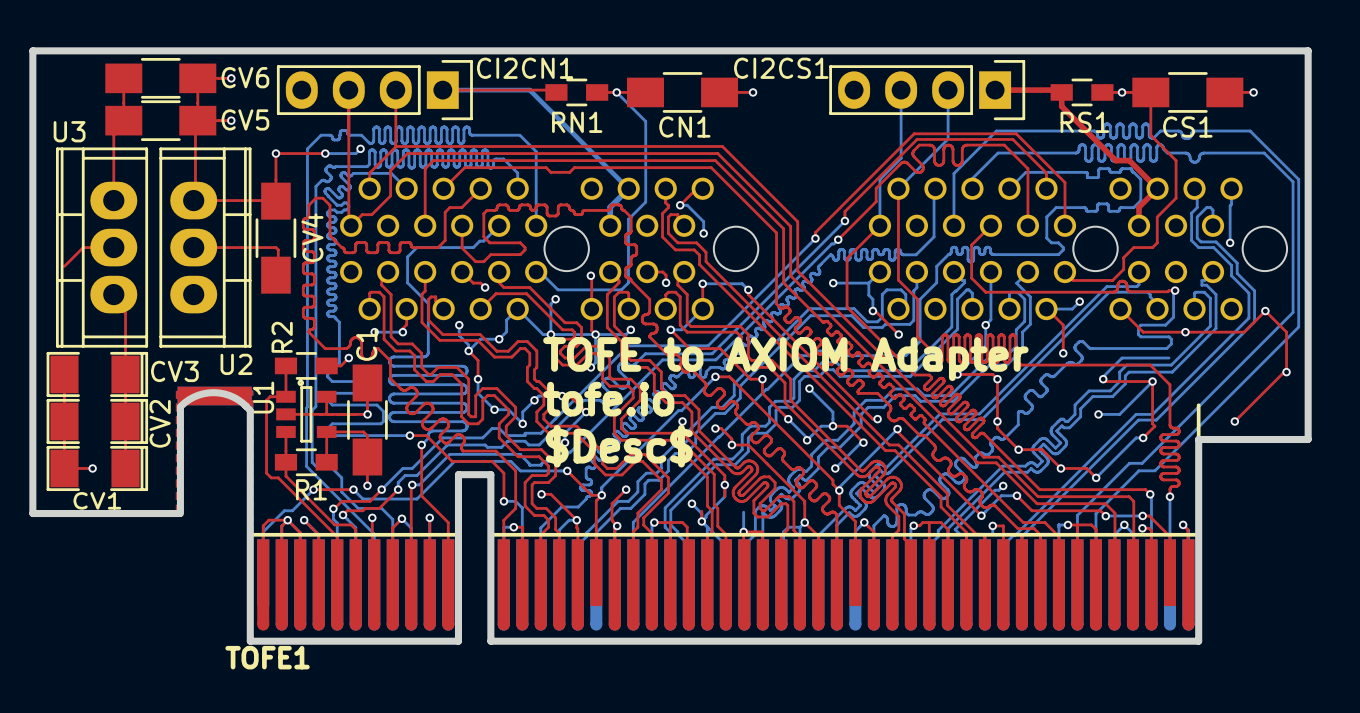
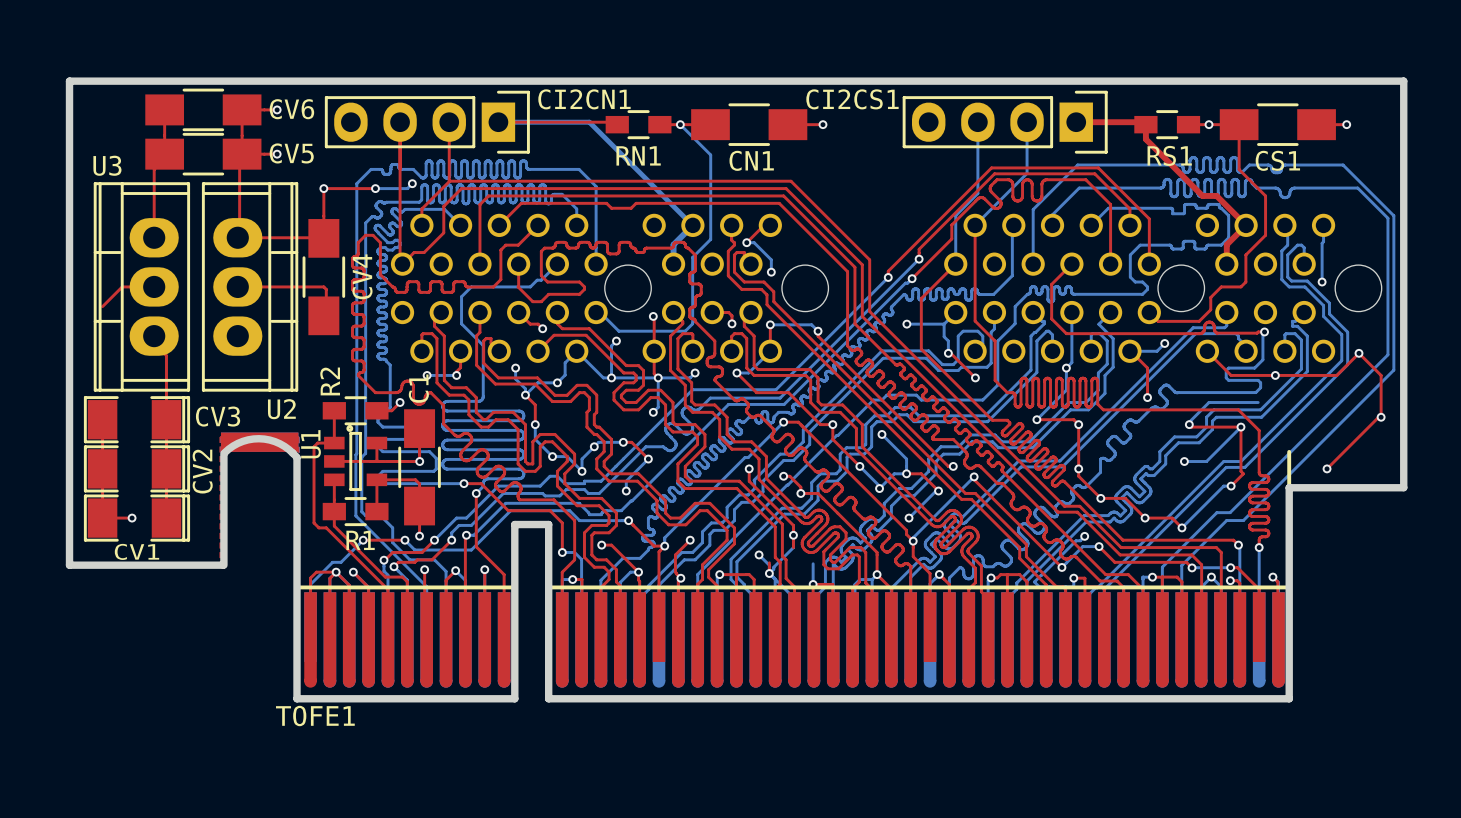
text: TOFE to AXIOM Adapter (785, 359) -> none
text: tofe.io (608, 399) -> none
text: $Desc$ (619, 446) -> none

